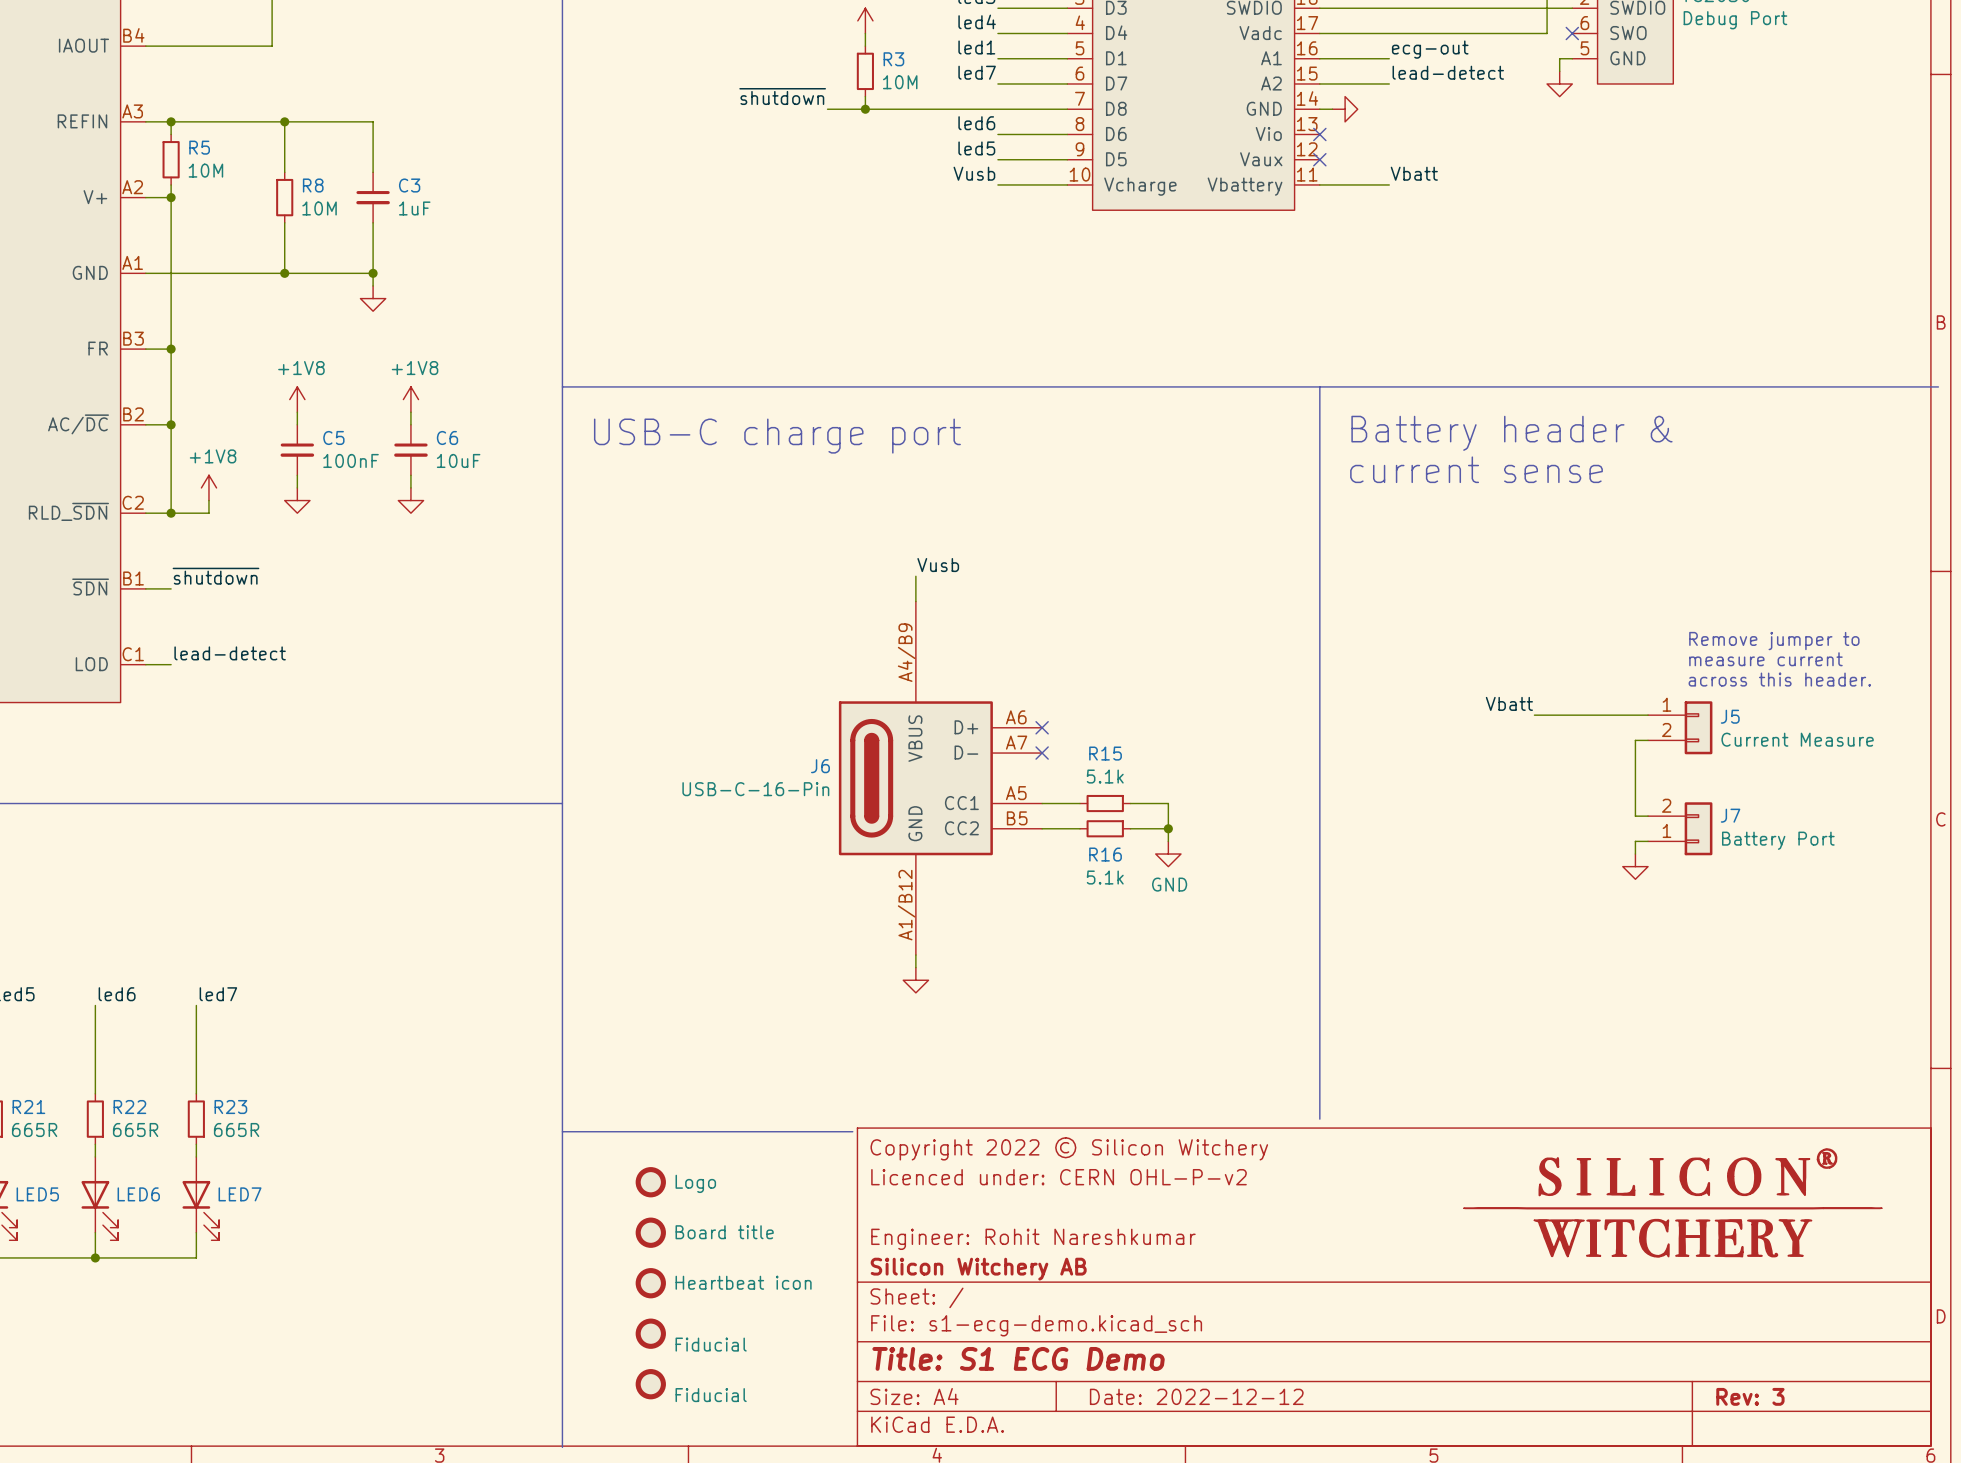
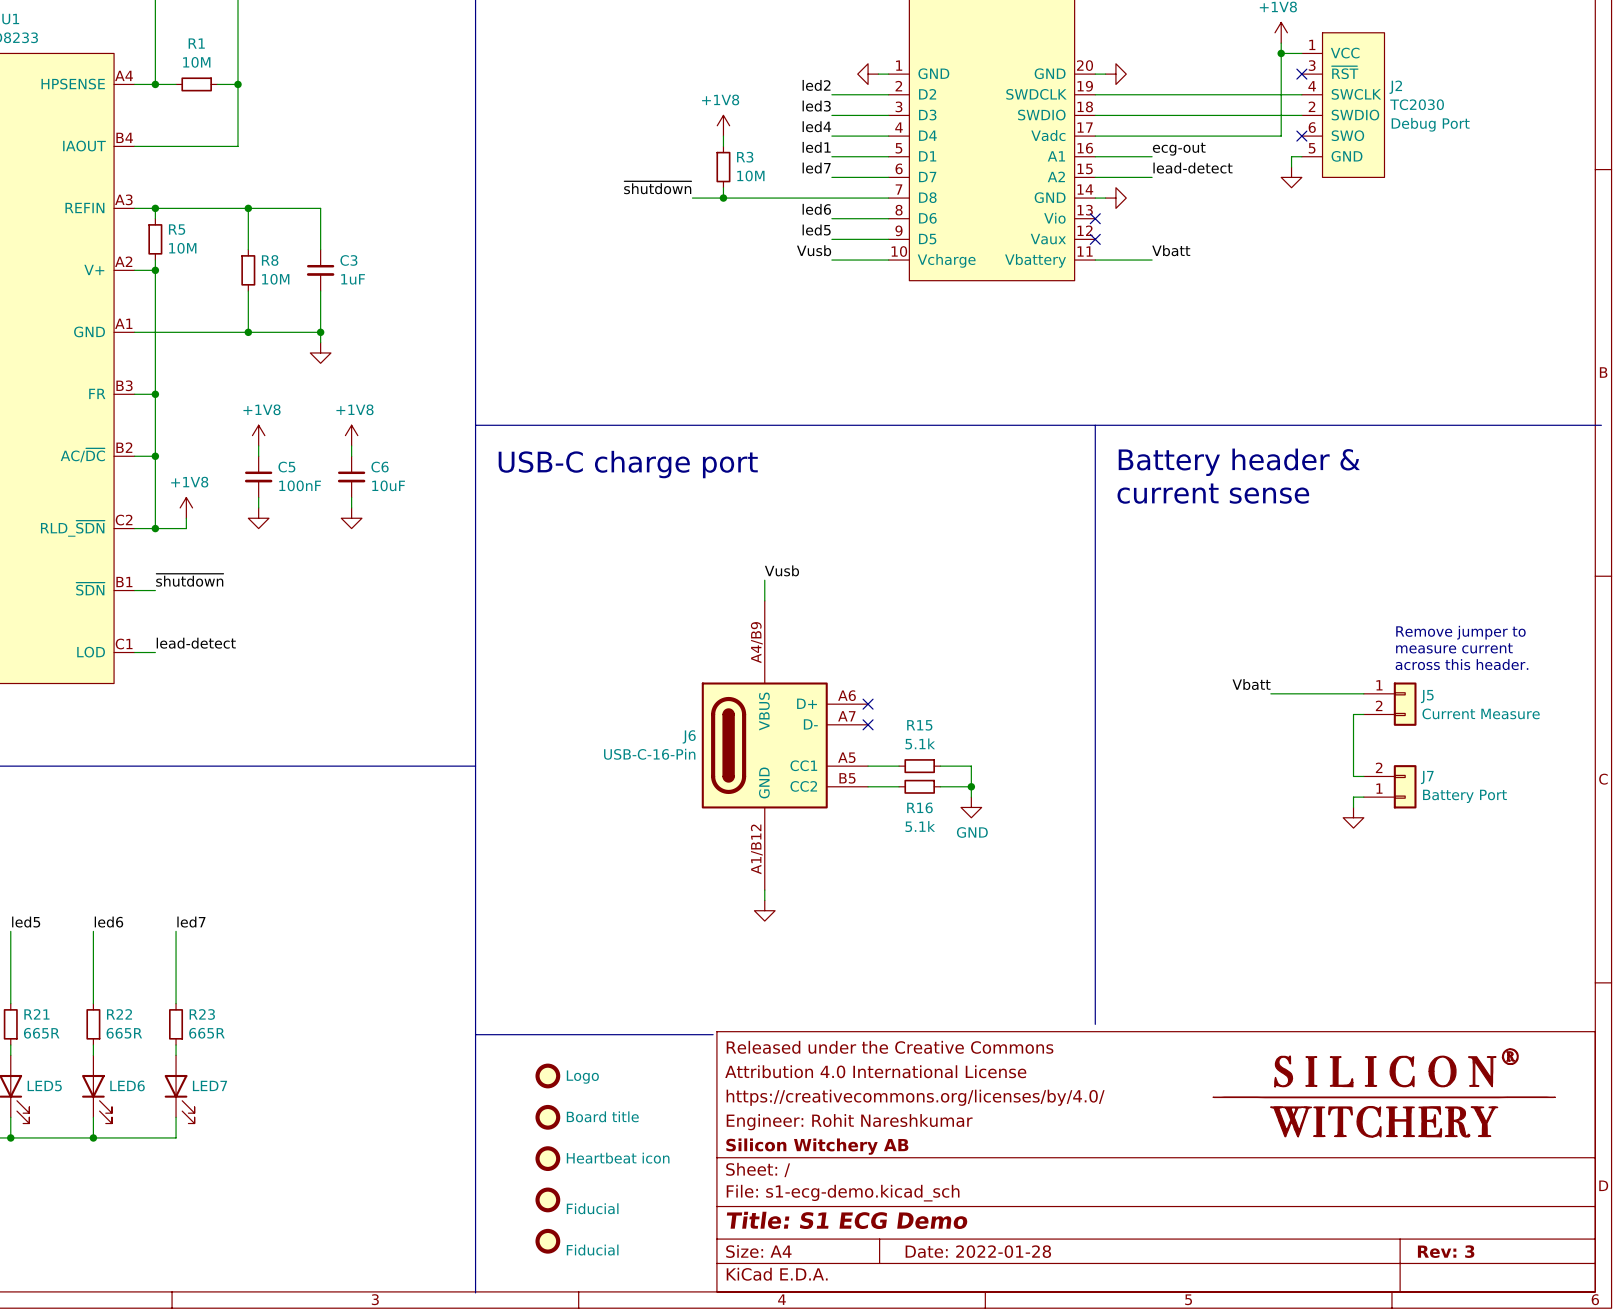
title block: Copyright 2022 © Silicon Witchery (1069, 1148) -> Released under the Creative Commons (890, 1047)
title block: Licenced under: CERN OHL-P-v2 (1059, 1177) -> Attribution 4.0 International License (875, 1071)
title block: none -> https://creativecommons.org/licenses/by/4.0/ (915, 1097)
title block: Date: 2022-12-12 (1196, 1396) -> Date: 2022-01-28 (978, 1251)

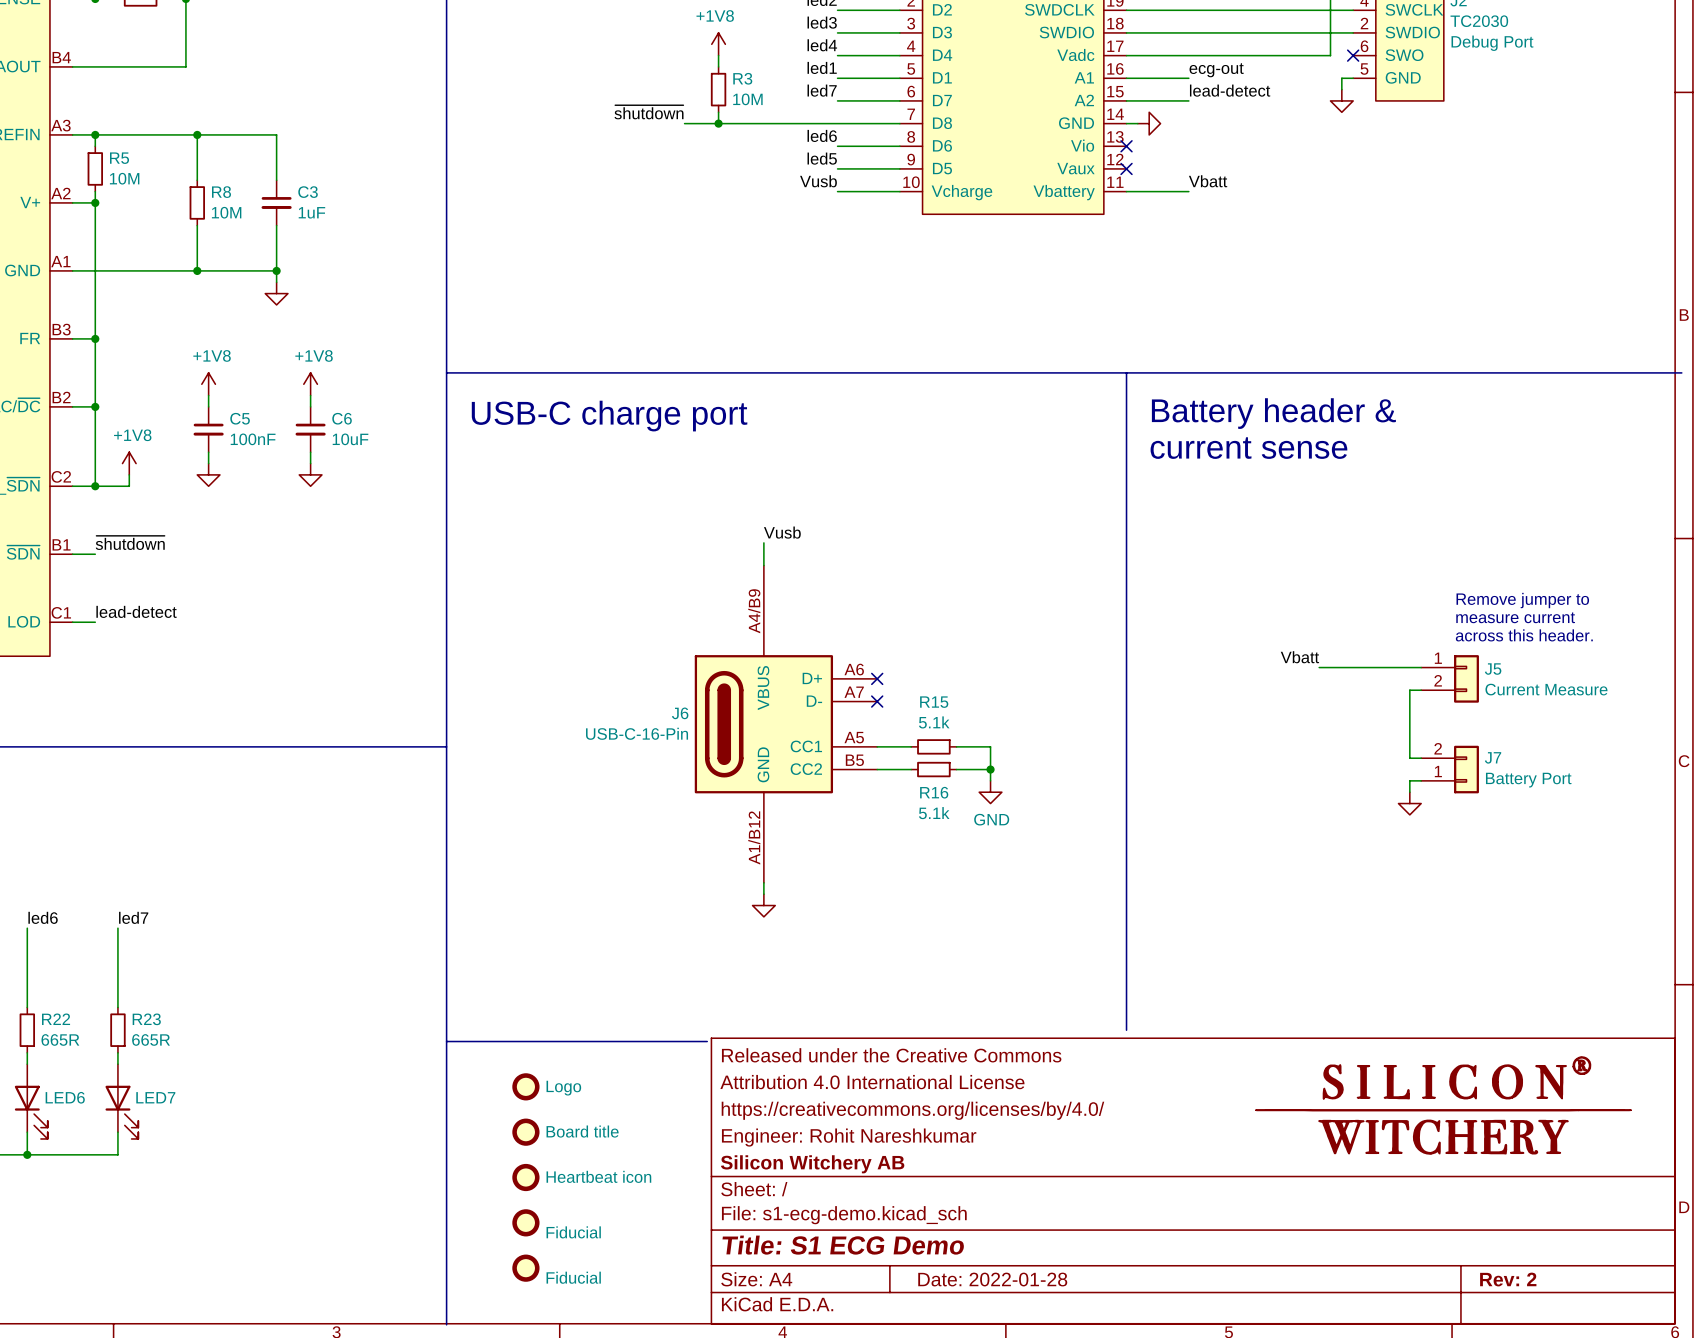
title block: Rev: 3 (1446, 1251) -> Rev: 2 (1508, 1279)

